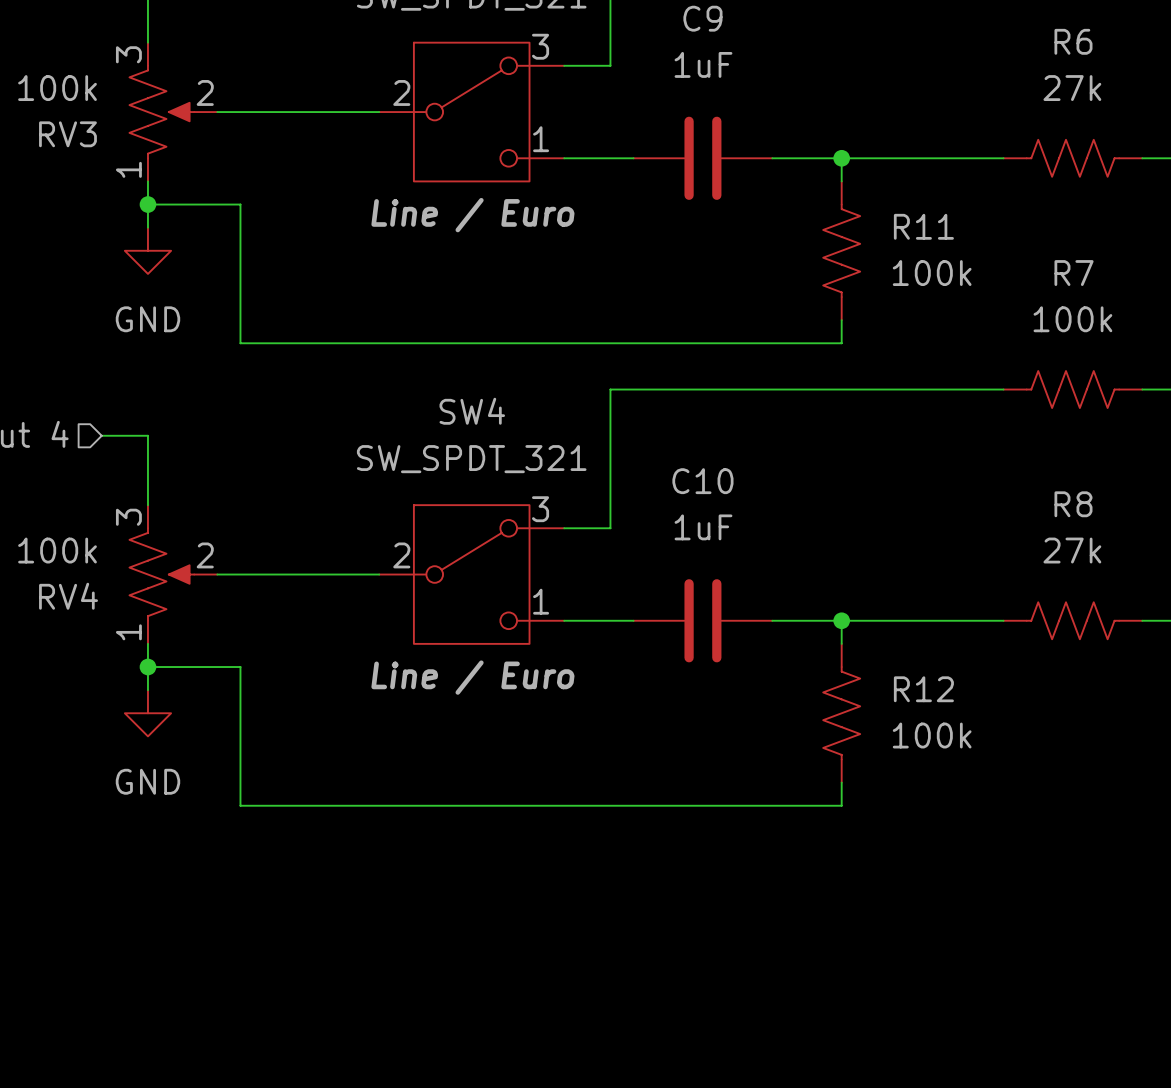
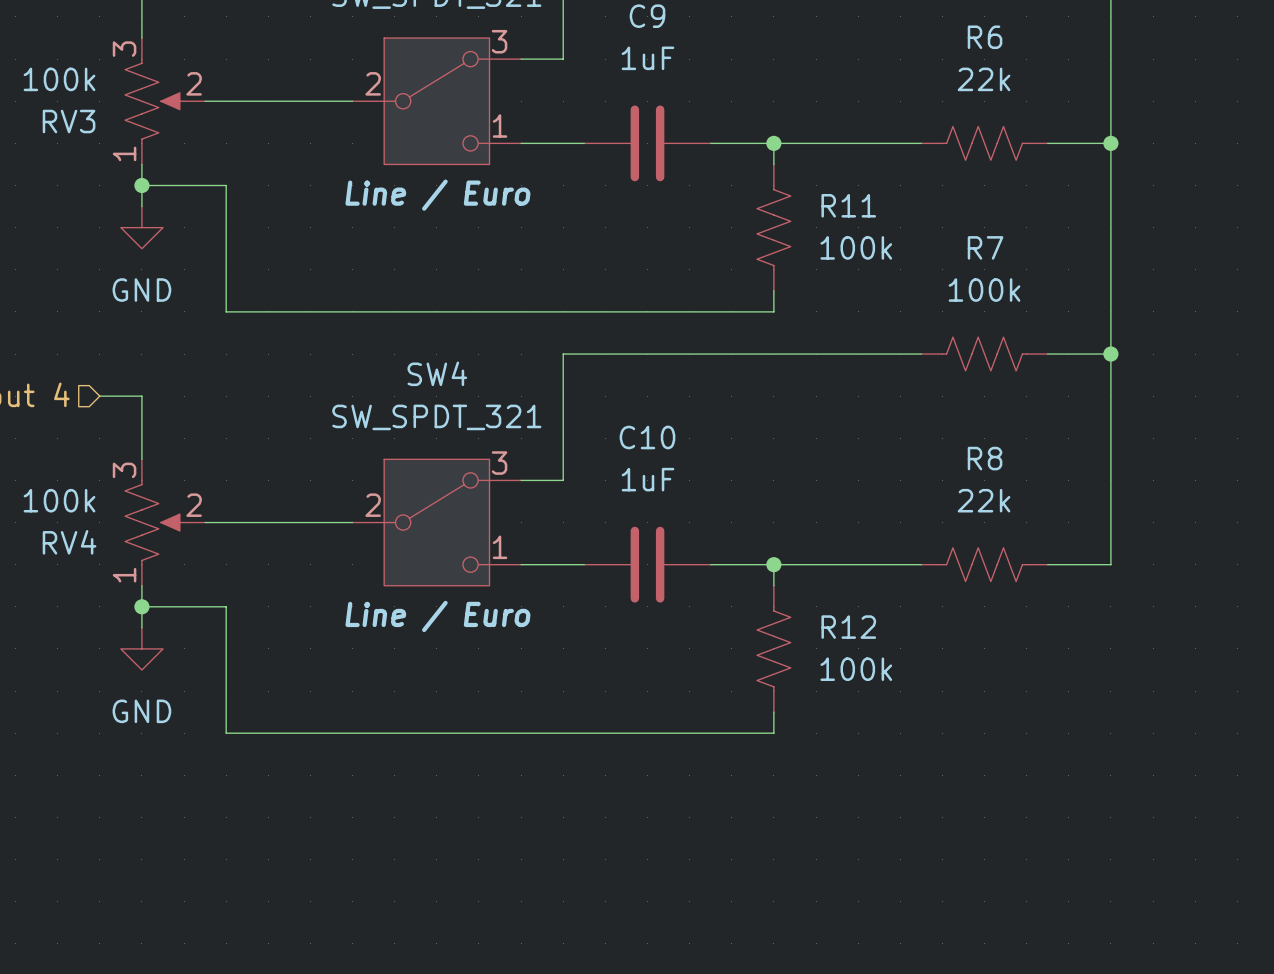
R6 value: 27k (1072, 88) -> 22k (984, 79)
R8 value: 27k (1072, 550) -> 22k (984, 500)

